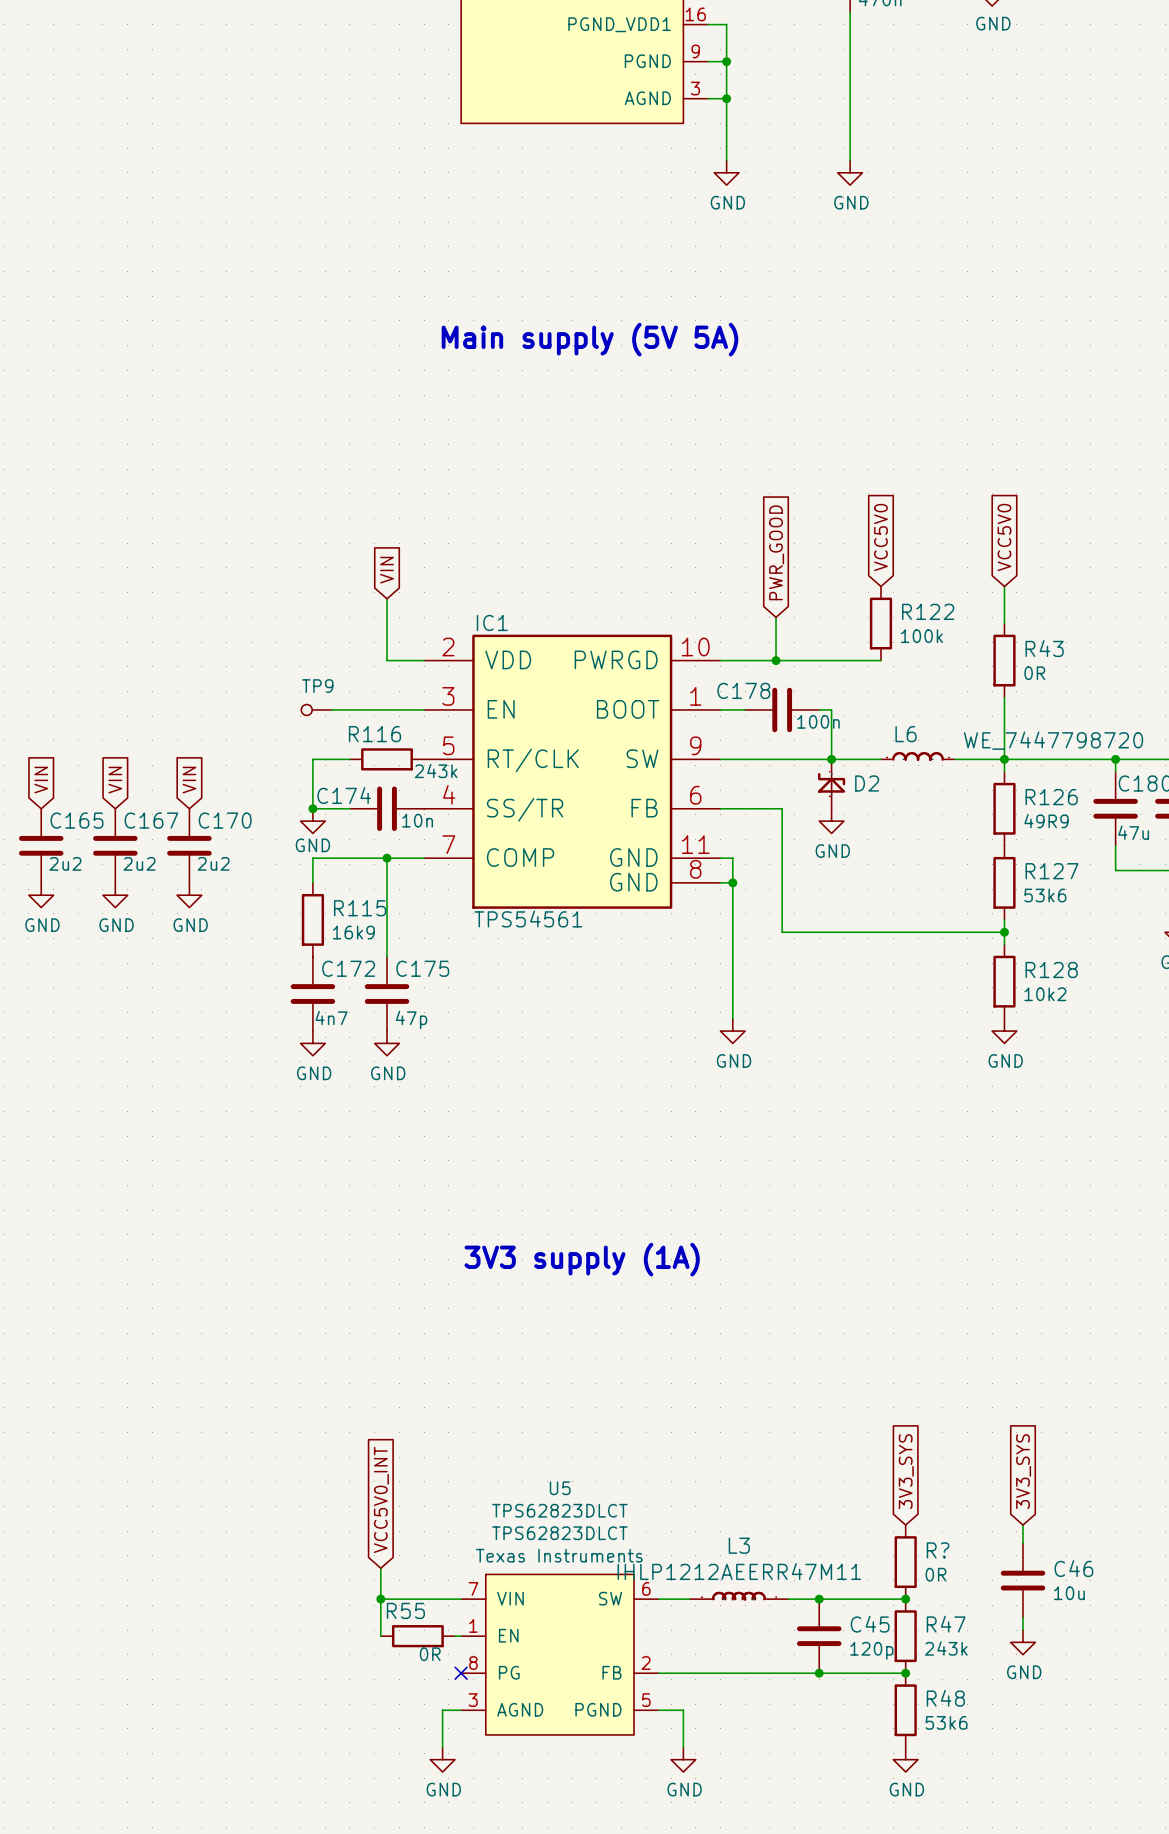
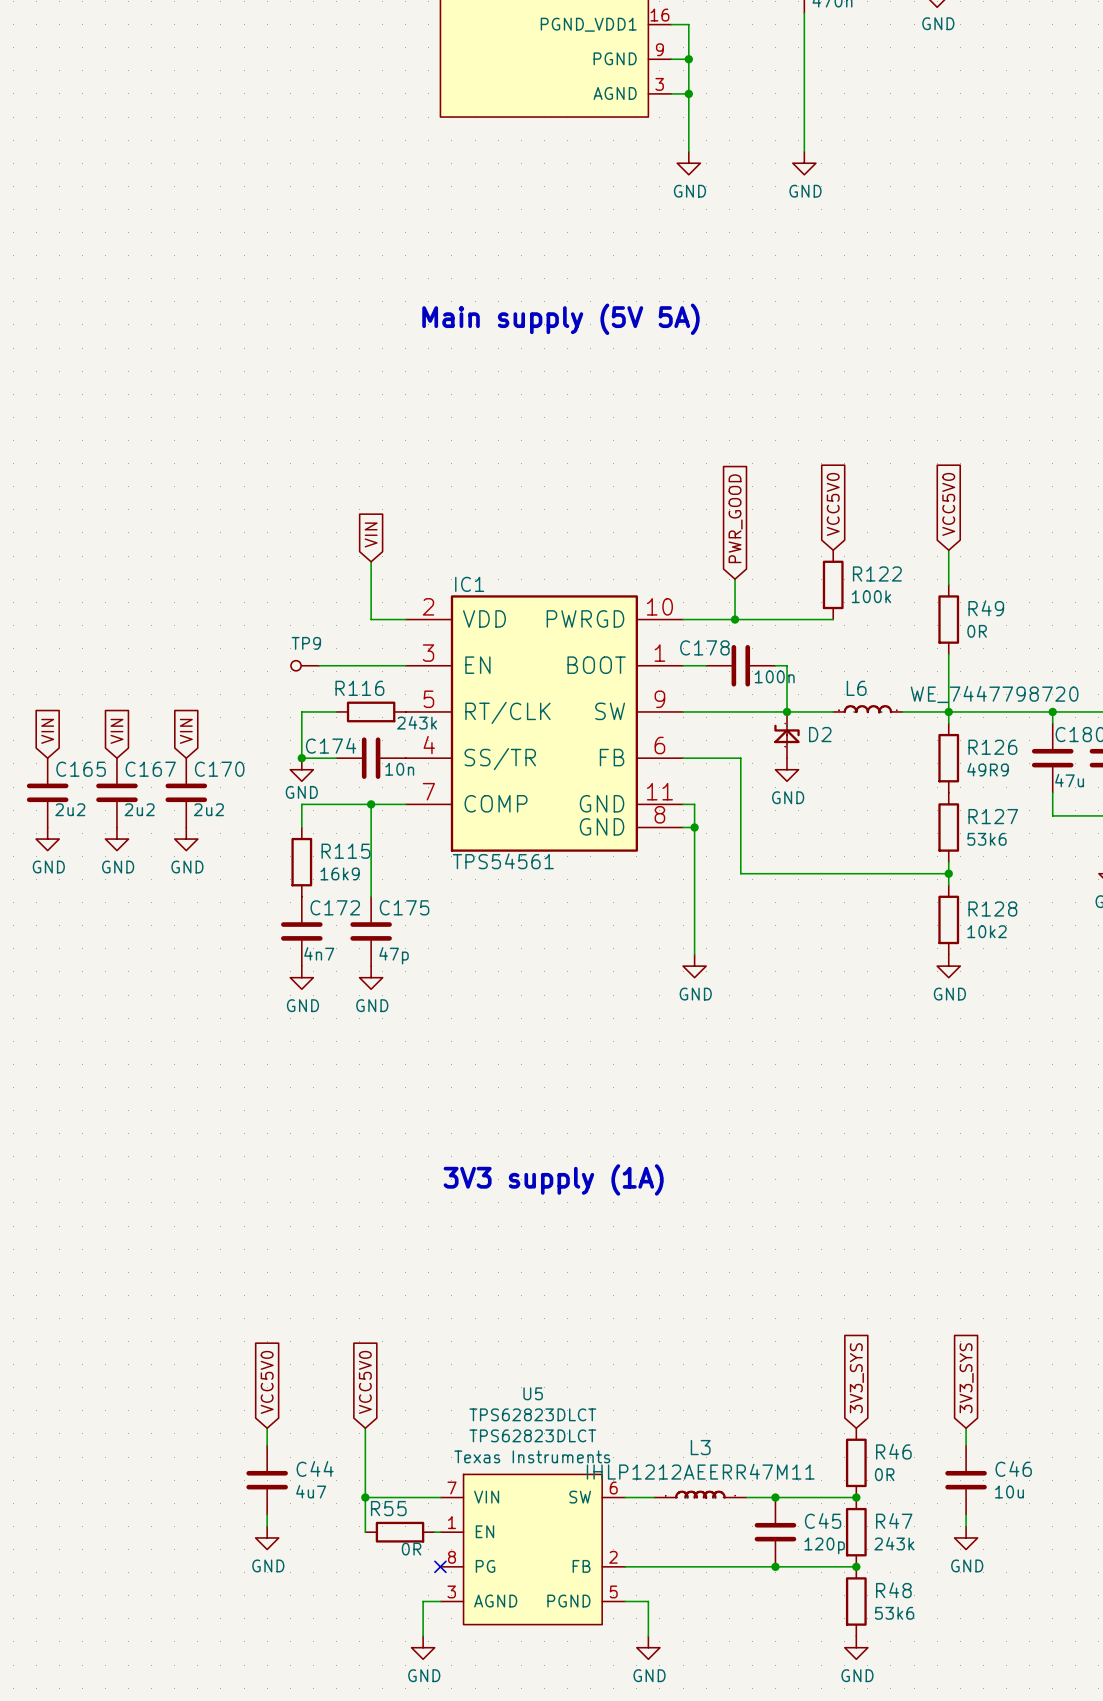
R43 name: R43 (1044, 648) -> R49 (986, 608)
global label: none -> VCC5V0 (267, 1382)
global label: VCC5V0_INT (381, 1499) -> VCC5V0 (365, 1382)
wire: none -> (267, 1428) (267, 1445)
wire: none -> (365, 1428) (365, 1468)
R? name: R? (938, 1550) -> R46 (893, 1451)
C44: none -> (267, 1480)
wire: none -> (267, 1514) (267, 1526)
power symbol: none -> GND (267, 1537)

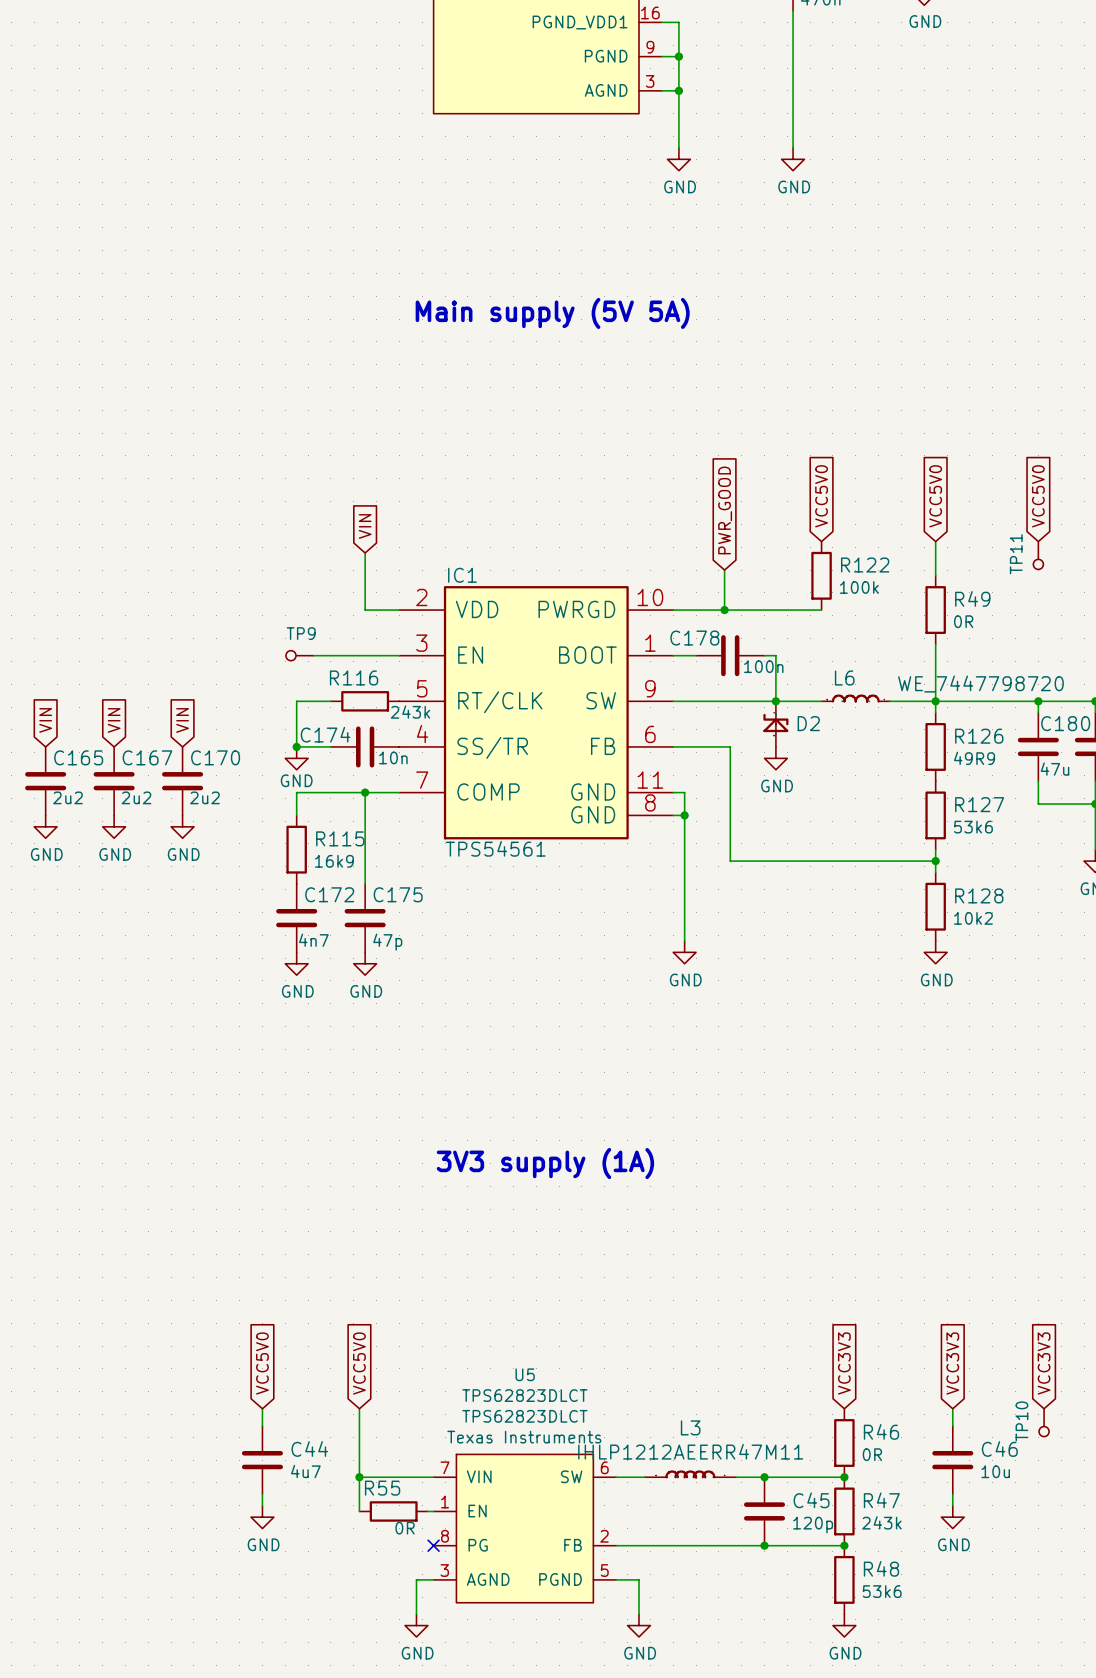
global label: none -> VCC5V0 (1038, 496)
TP11: none -> (1038, 555)
global label: 3V3_SYS (856, 1378) -> VCC3V3 (844, 1363)
global label: 3V3_SYS (966, 1378) -> VCC3V3 (952, 1363)
global label: none -> VCC3V3 (1044, 1363)
TP10: none -> (1044, 1422)

